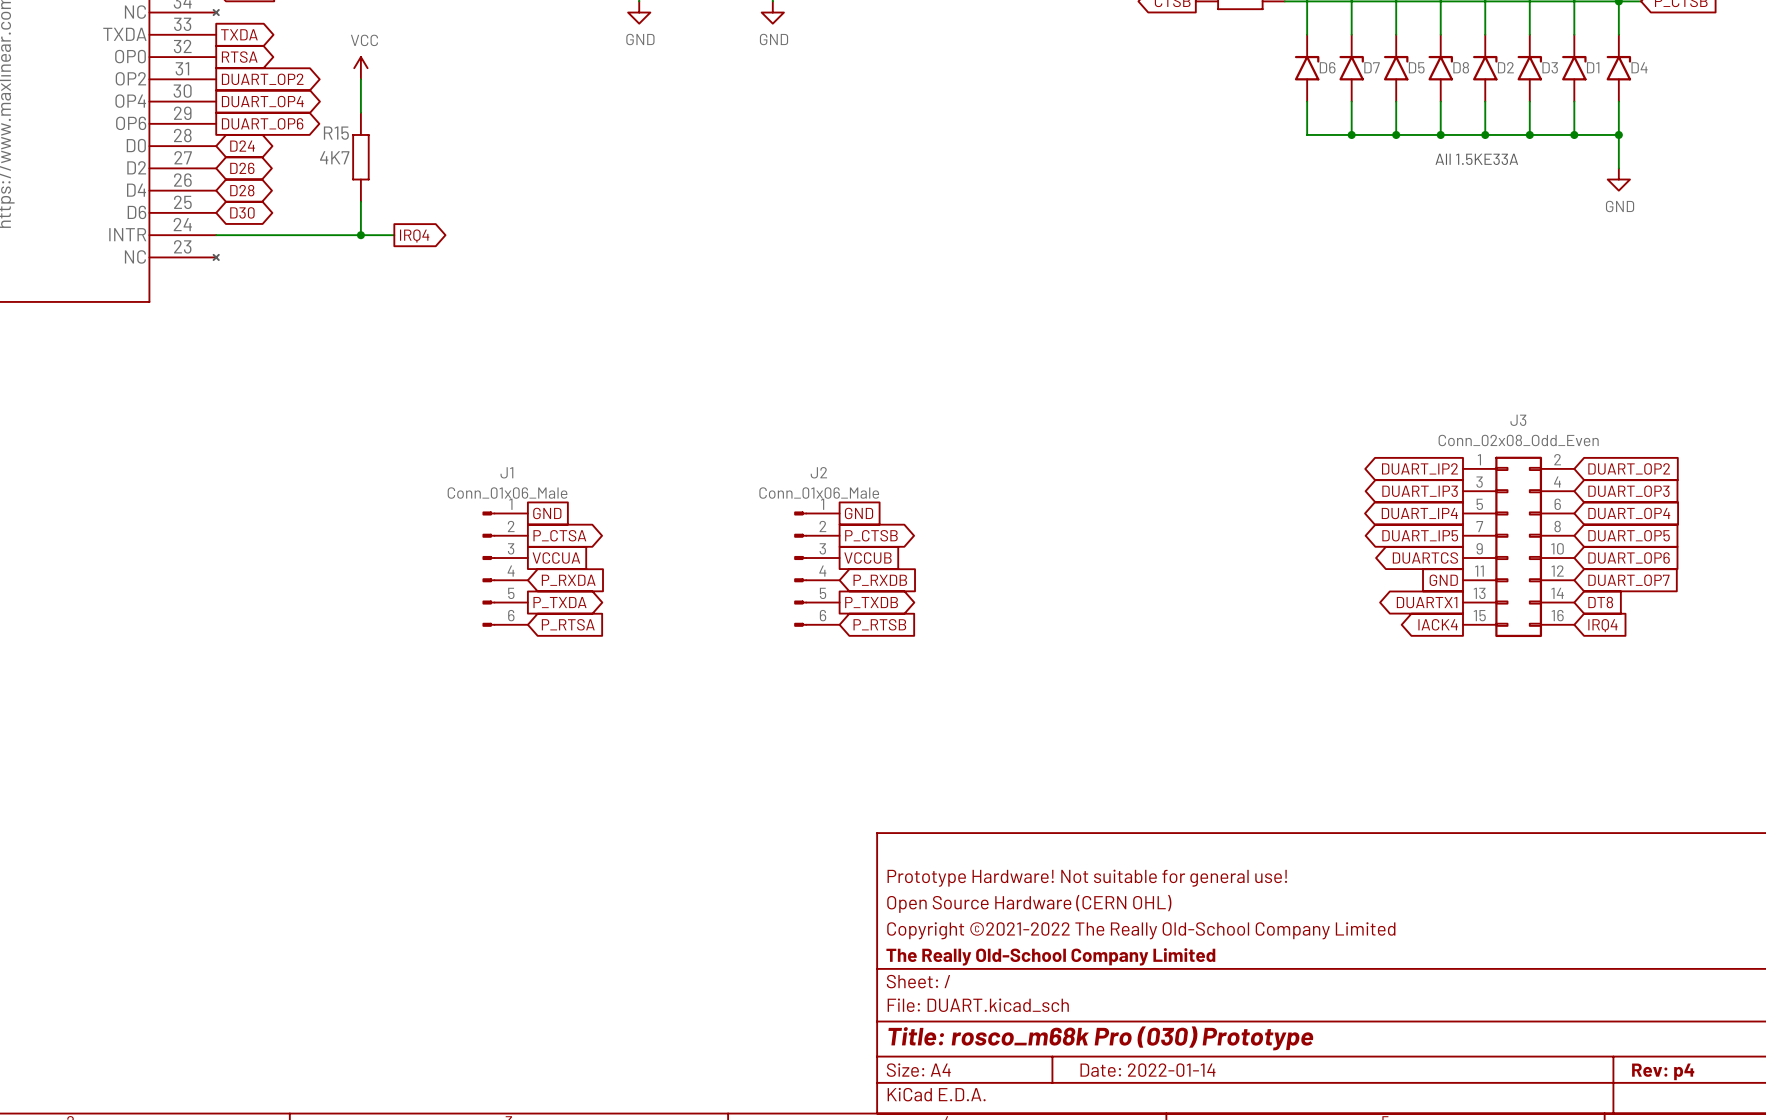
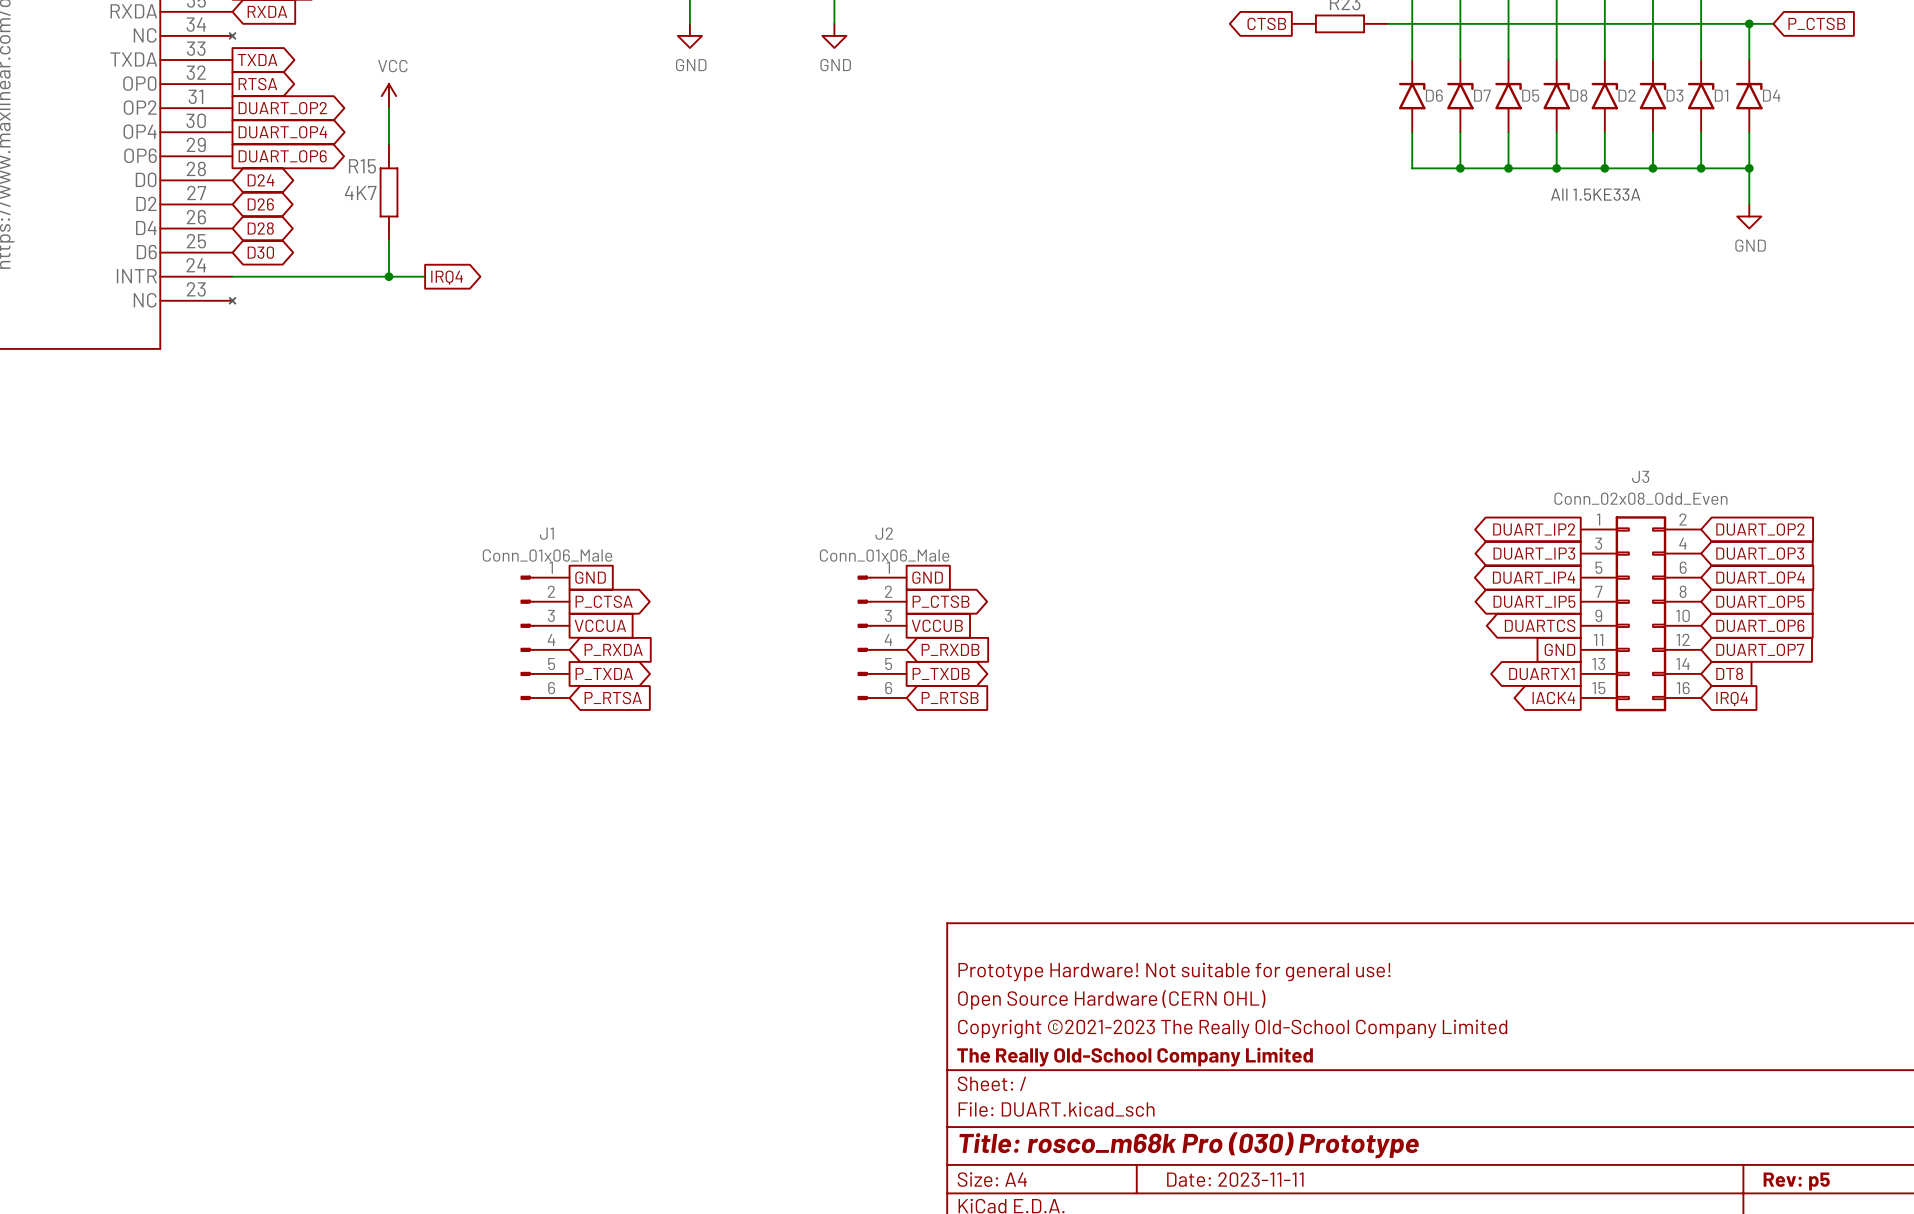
title block: Copyright ©2021-2022 The Really Old-School Company Limited (1141, 930) -> Copyright ©2021-2023 The Really Old-School Company Limited (1232, 1028)
title block: Date: 2022-01-14 (1147, 1070) -> Date: 2023-11-11 (1235, 1179)
title block: Rev: p4 (1663, 1071) -> Rev: p5 (1796, 1181)

